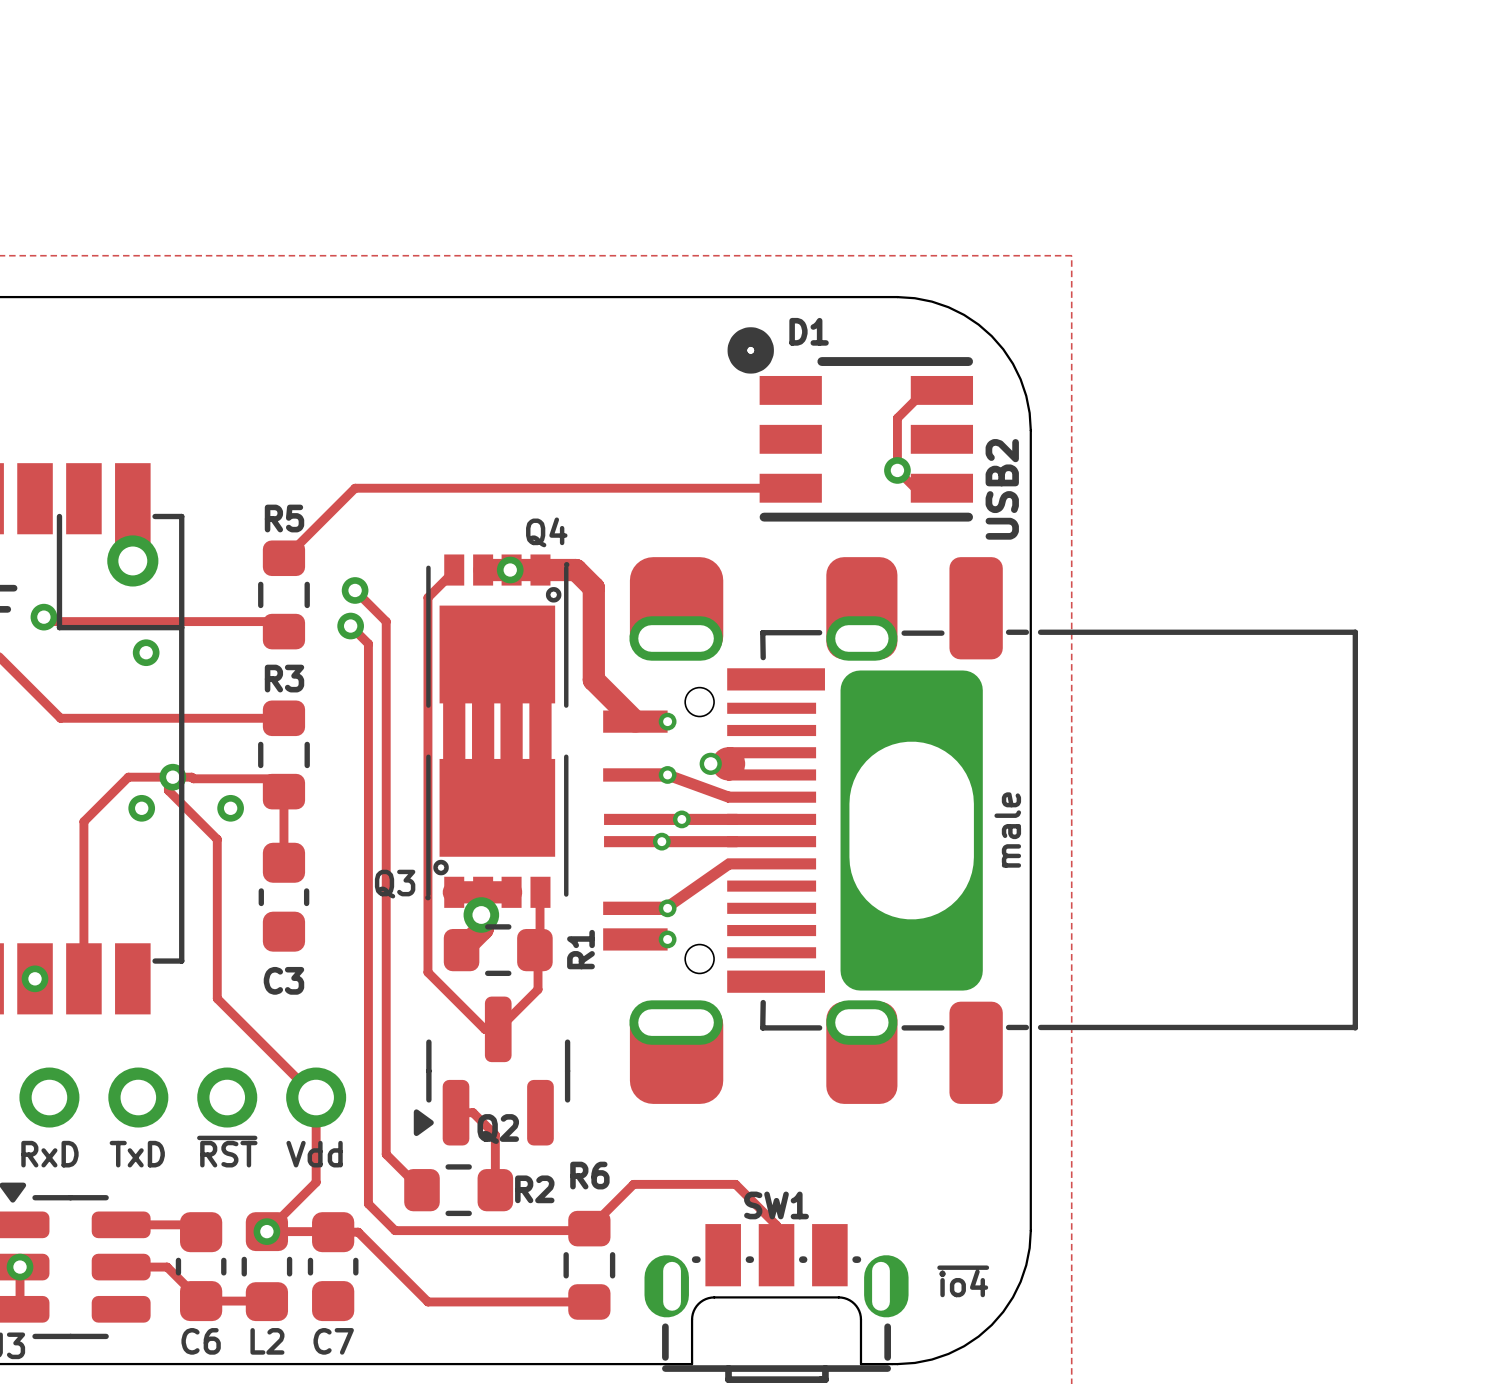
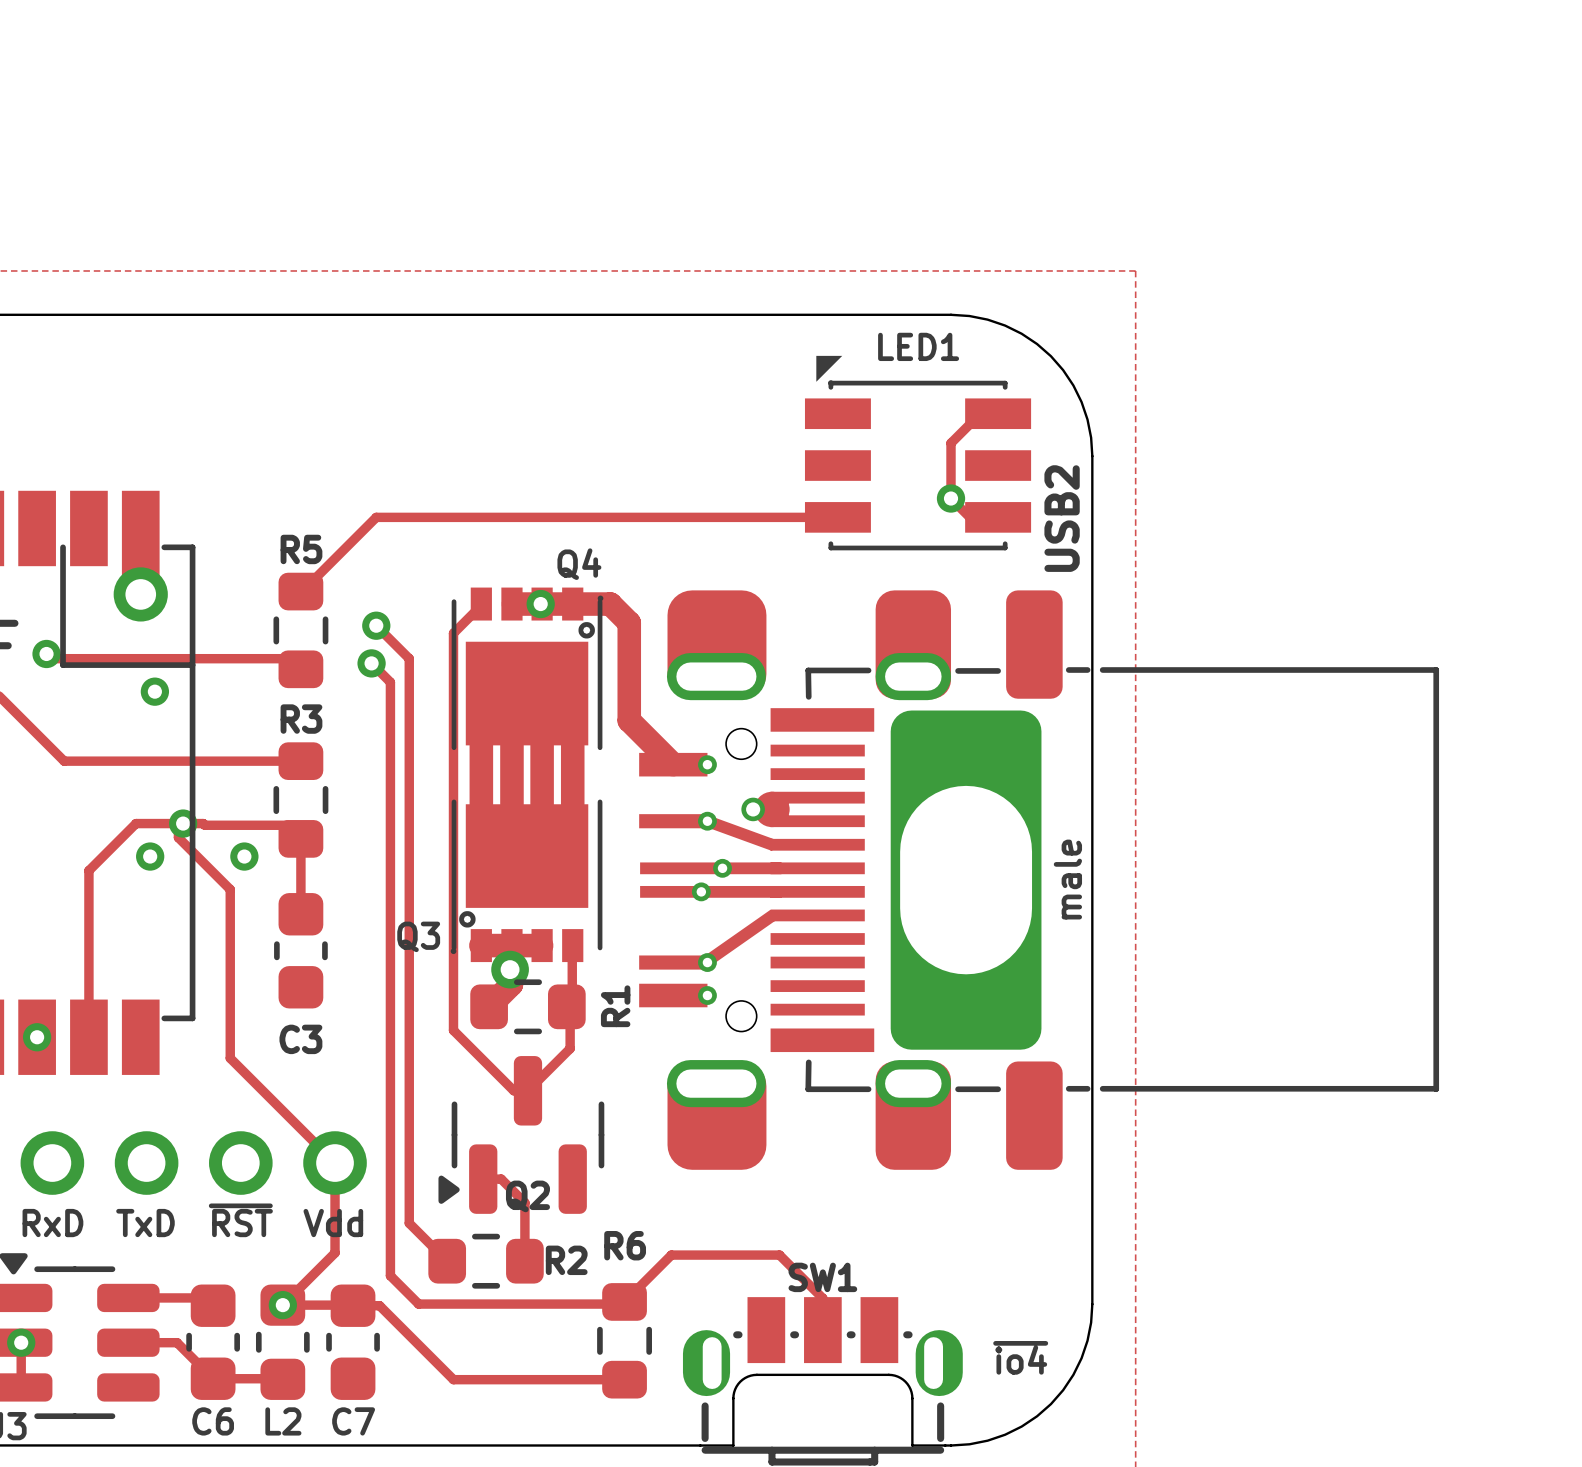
D1: (850, 424) -> none
LED1: none -> (918, 453)

